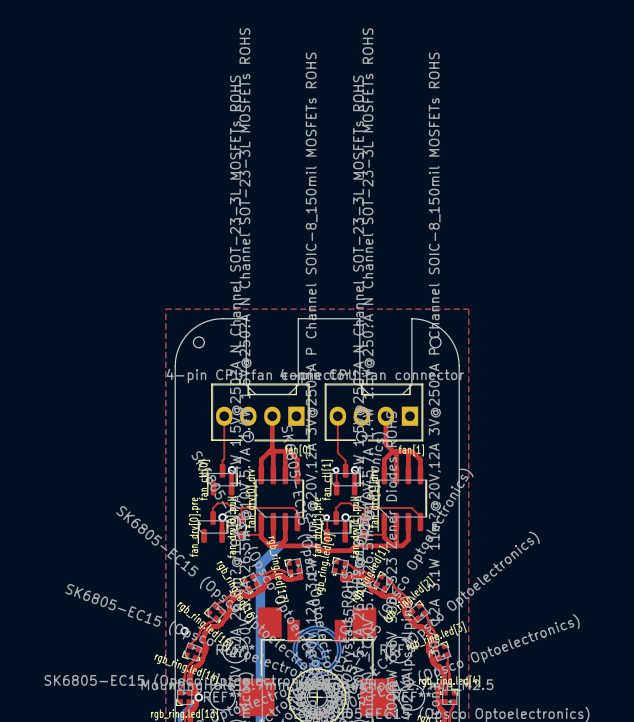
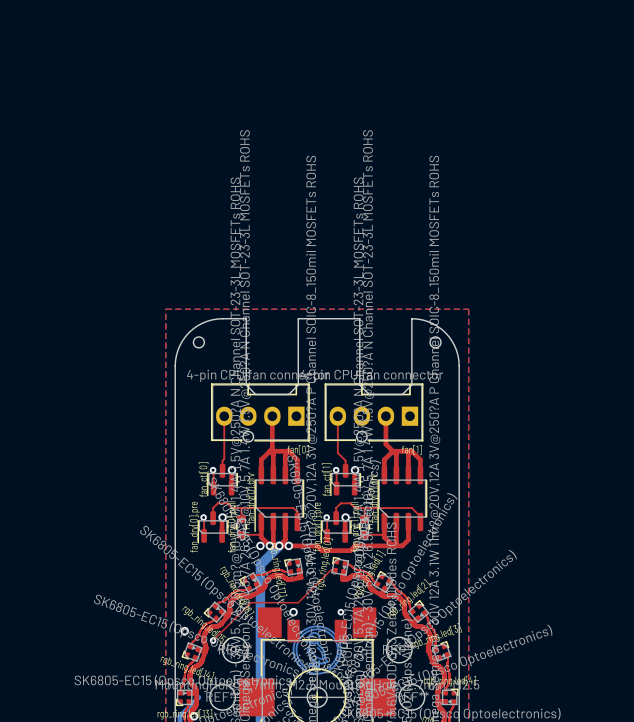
top track: none -> (213, 470) (213, 488)
via: none -> (213, 470)
top track: none -> (203, 517) (204, 535)
via: none -> (203, 517)
via: none -> (260, 545)
via: none -> (269, 545)
via: none -> (279, 545)
via: none -> (288, 545)
top track: none -> (335, 570) (330, 570) (298, 602) (250, 602) (213, 640)
via: none -> (293, 612)
via: none -> (340, 612)
via: none -> (213, 640)
via position: (198, 697) -> (194, 716)

